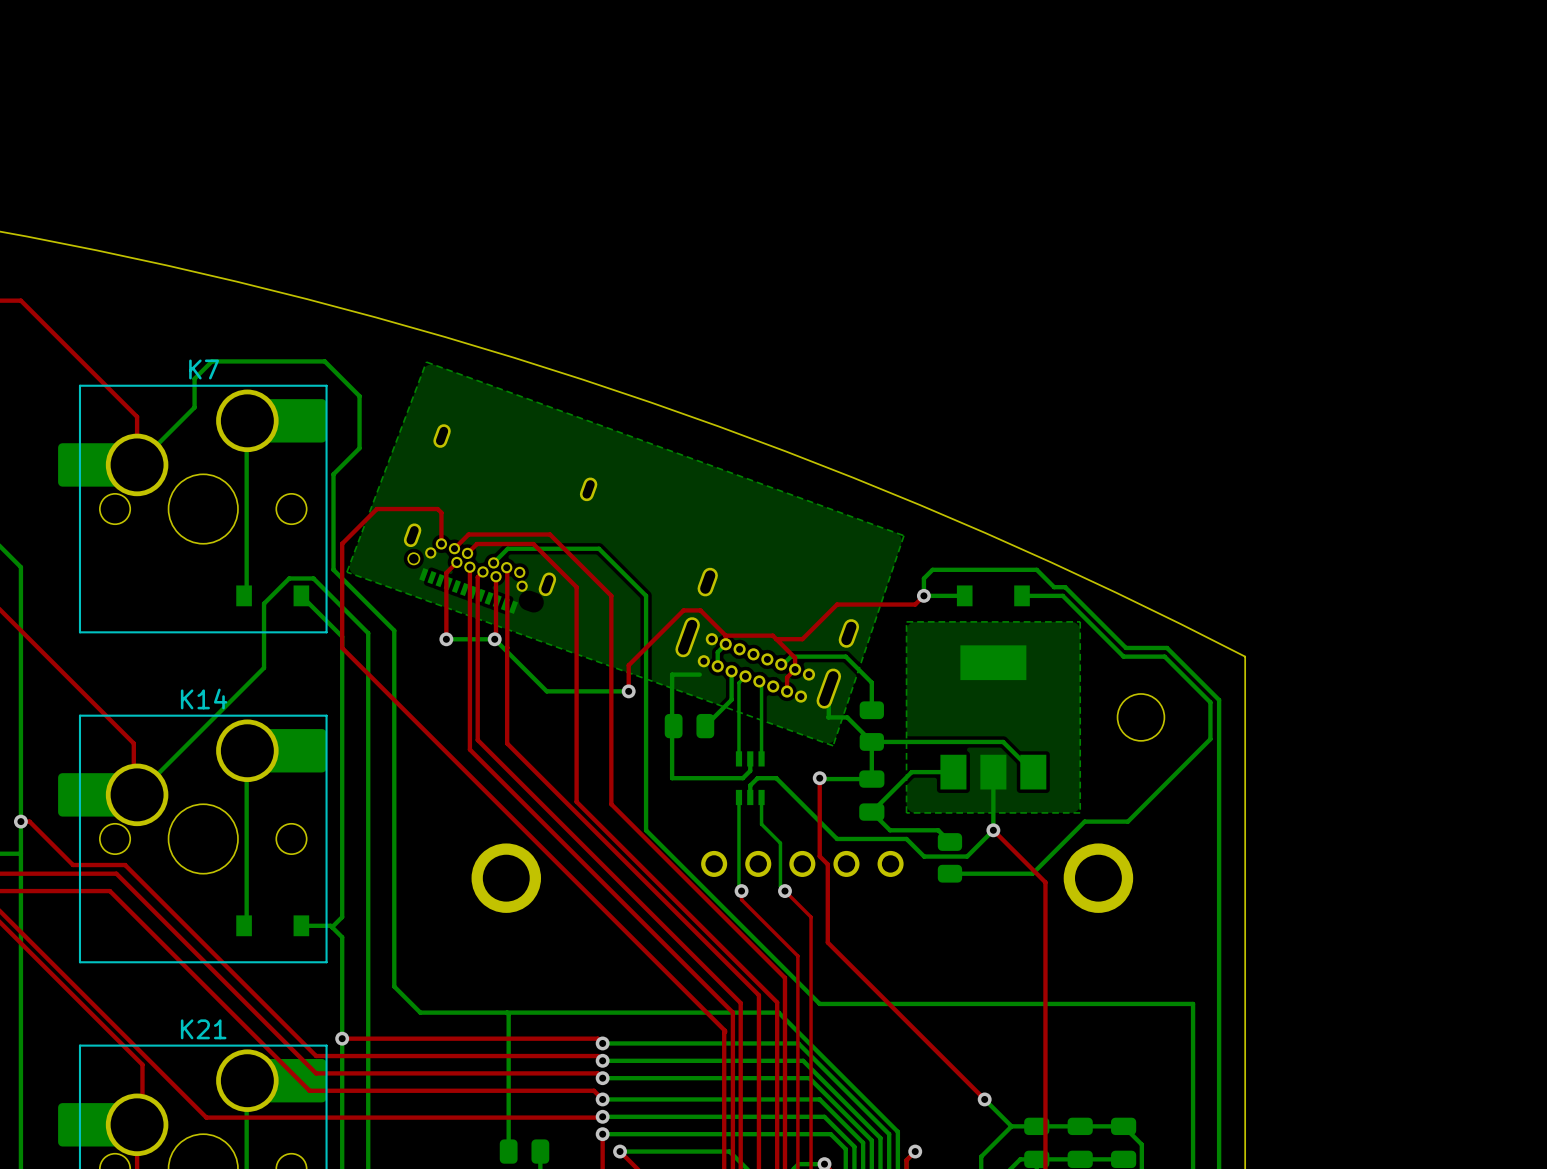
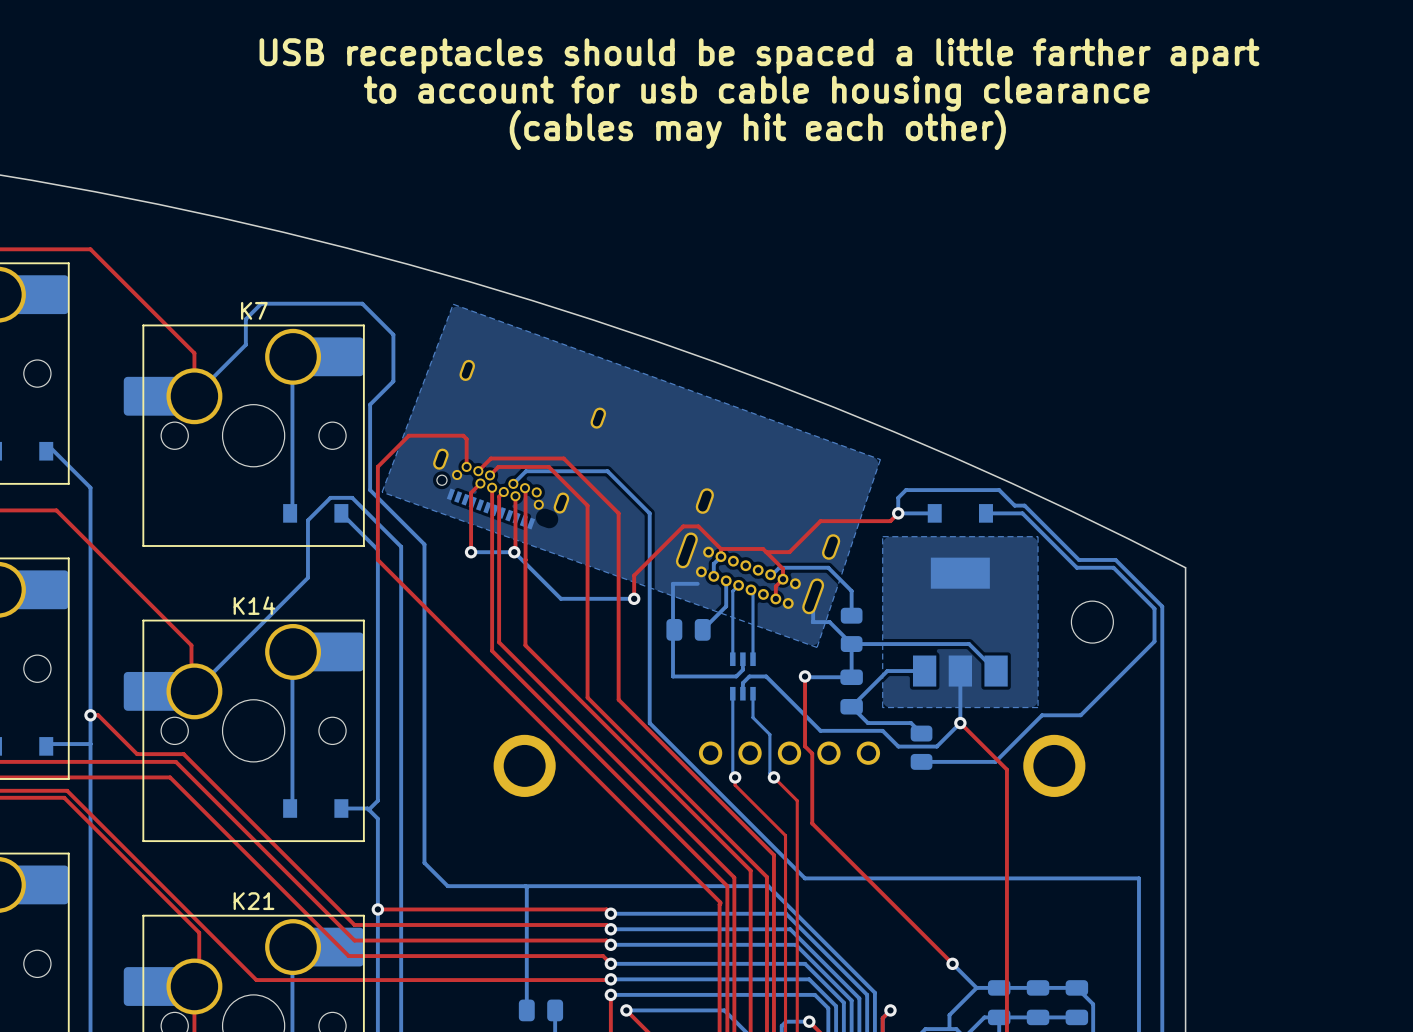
text: none -> USB receptacles should be spaced a little farther apart (759, 56)
text: none -> to account for usb cable housing clearance (756, 93)
text: none -> (cables may hit each other) (757, 129)

